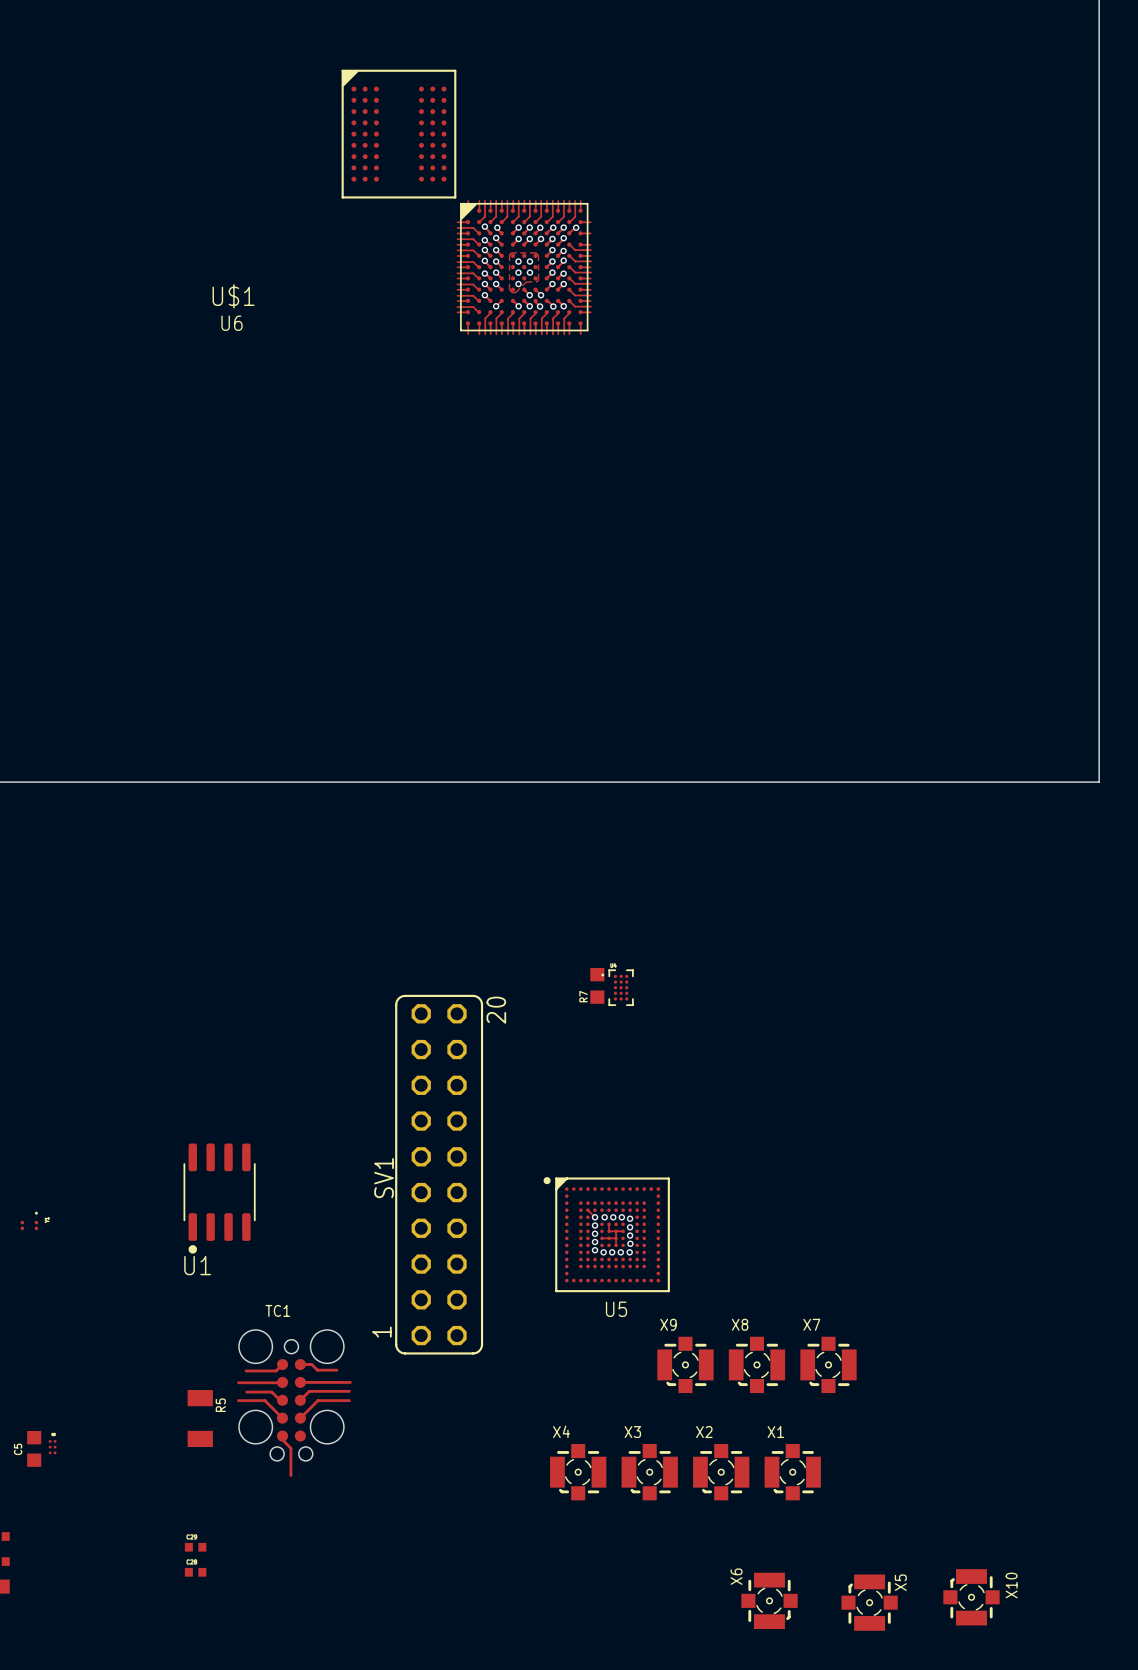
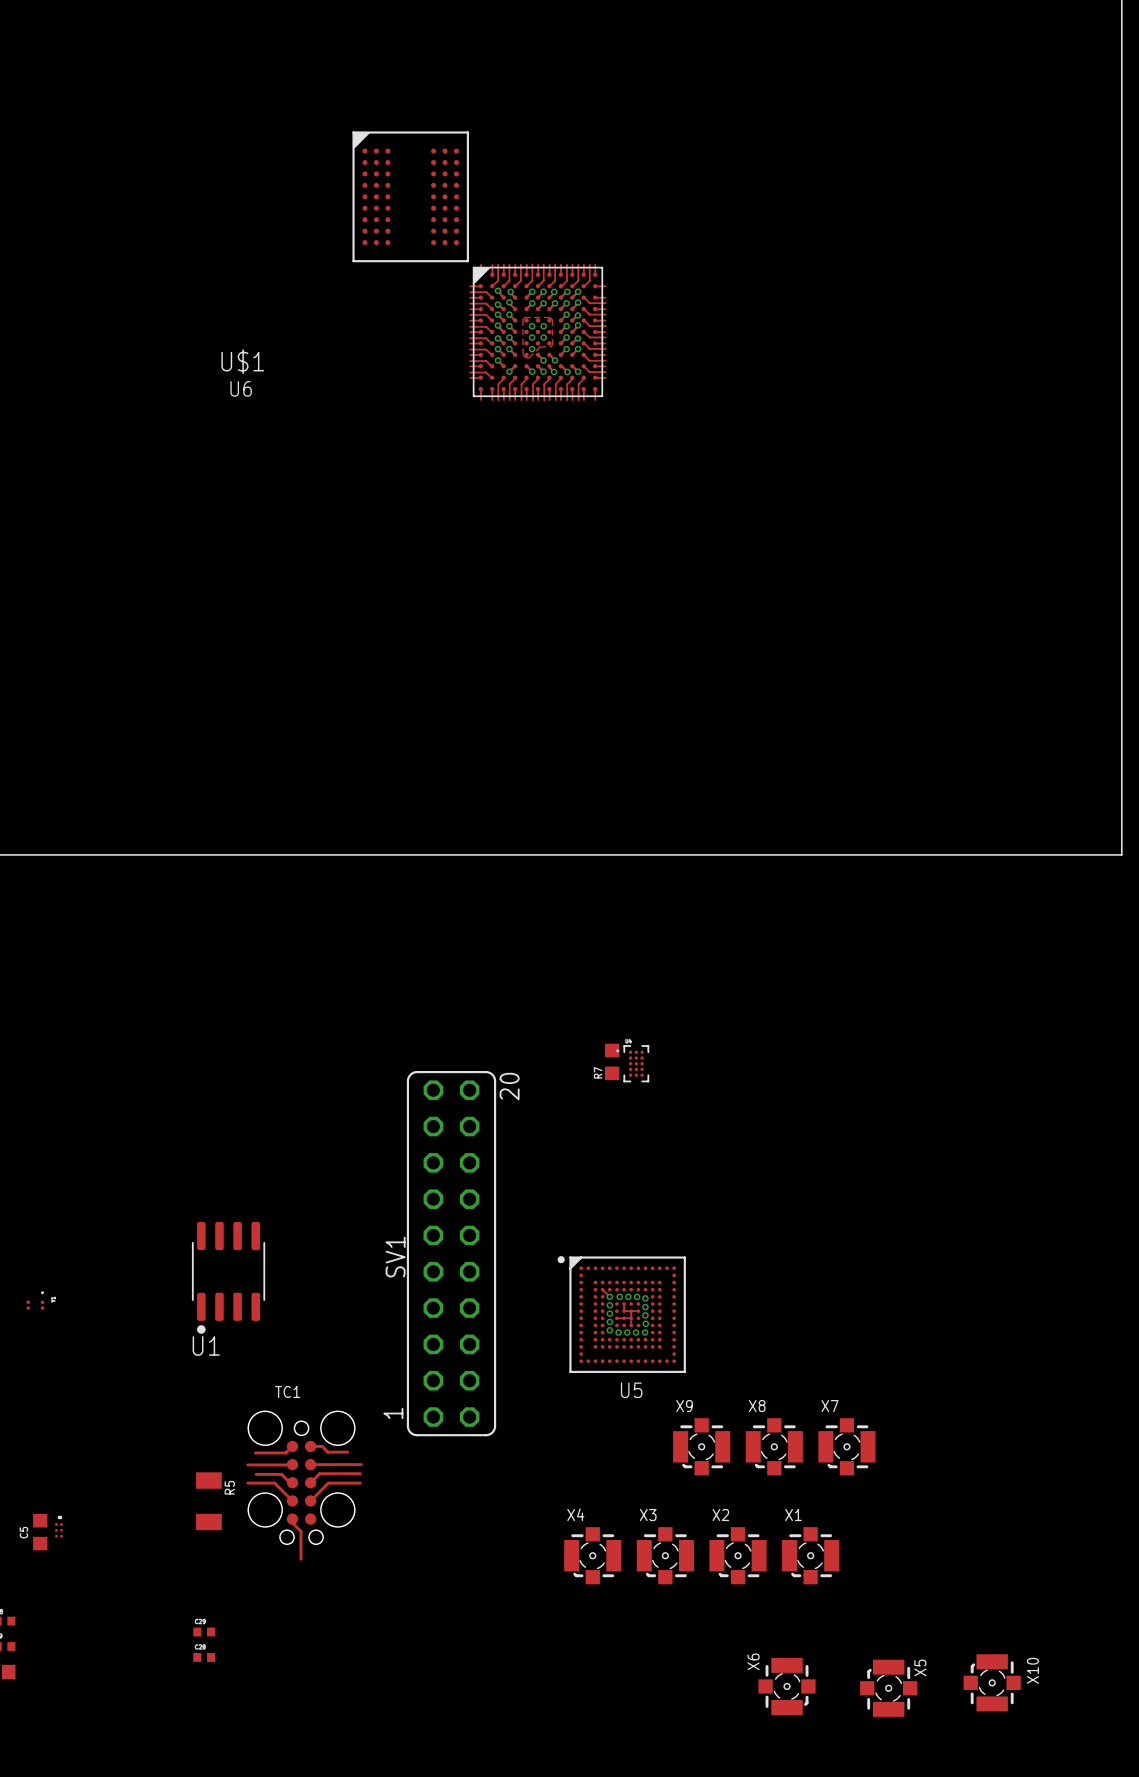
track: (576, 227) (569, 233) -> none
via: (576, 227) -> none
track: none -> (584, 297) (589, 303) (605, 303)

